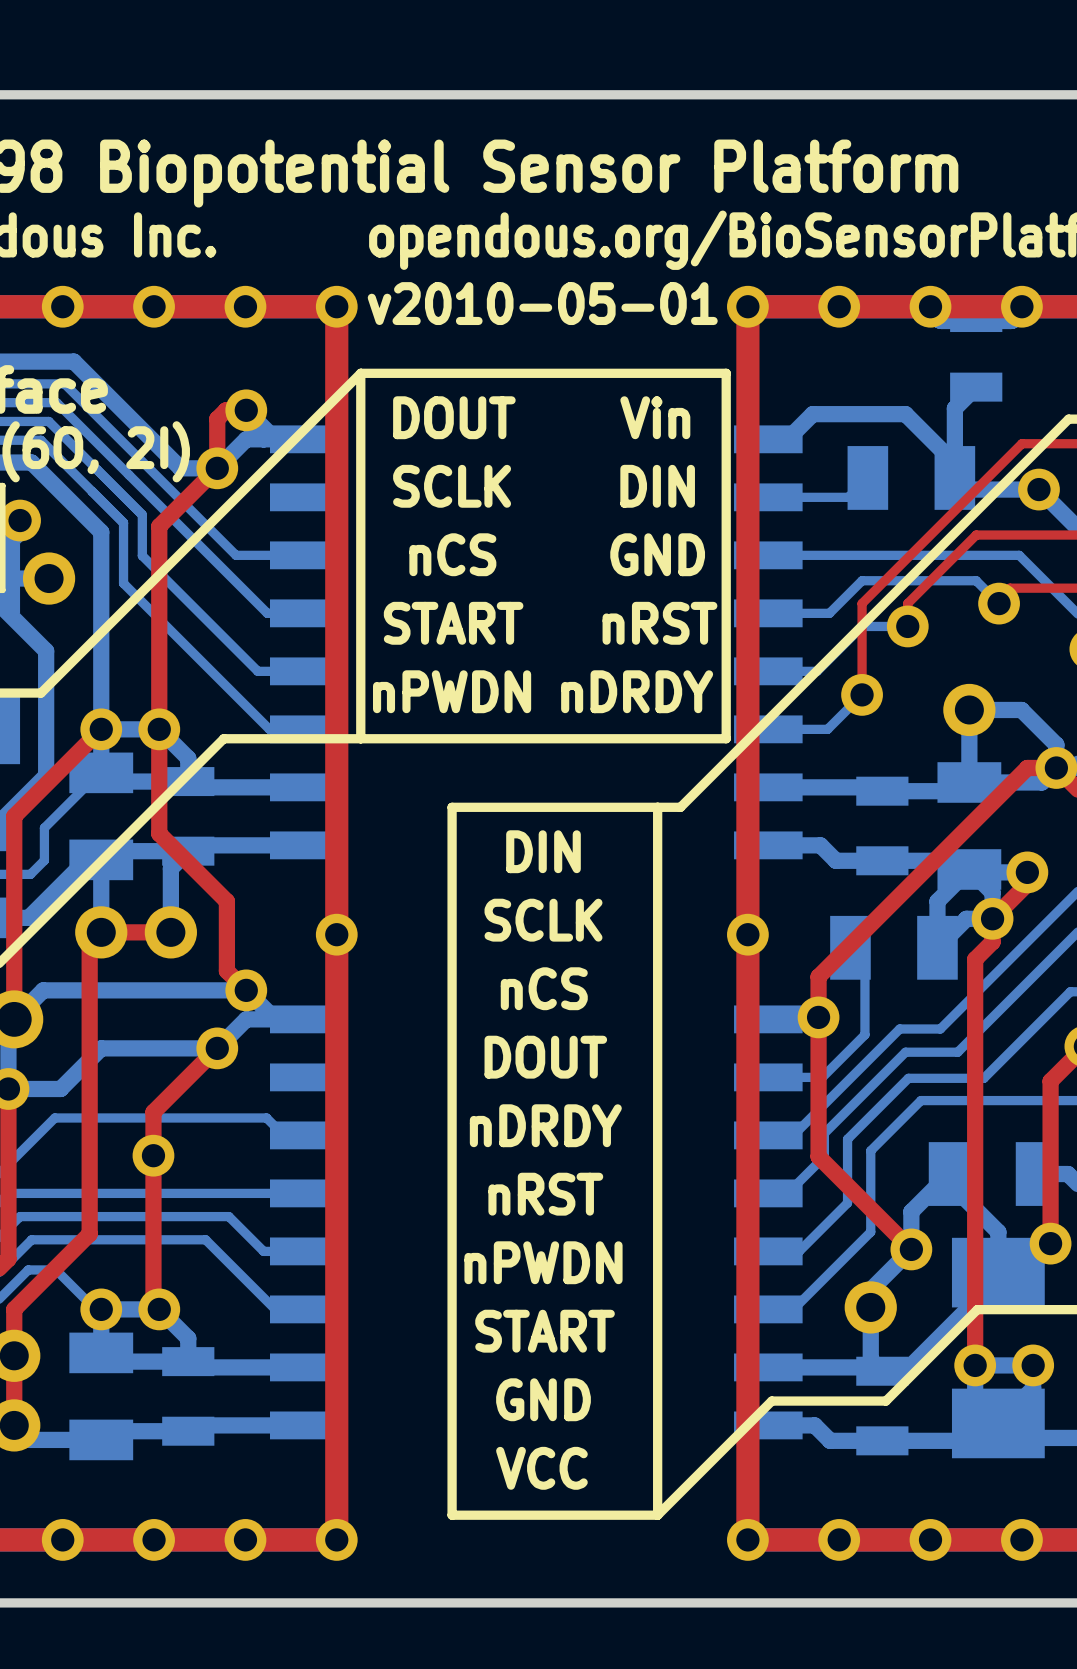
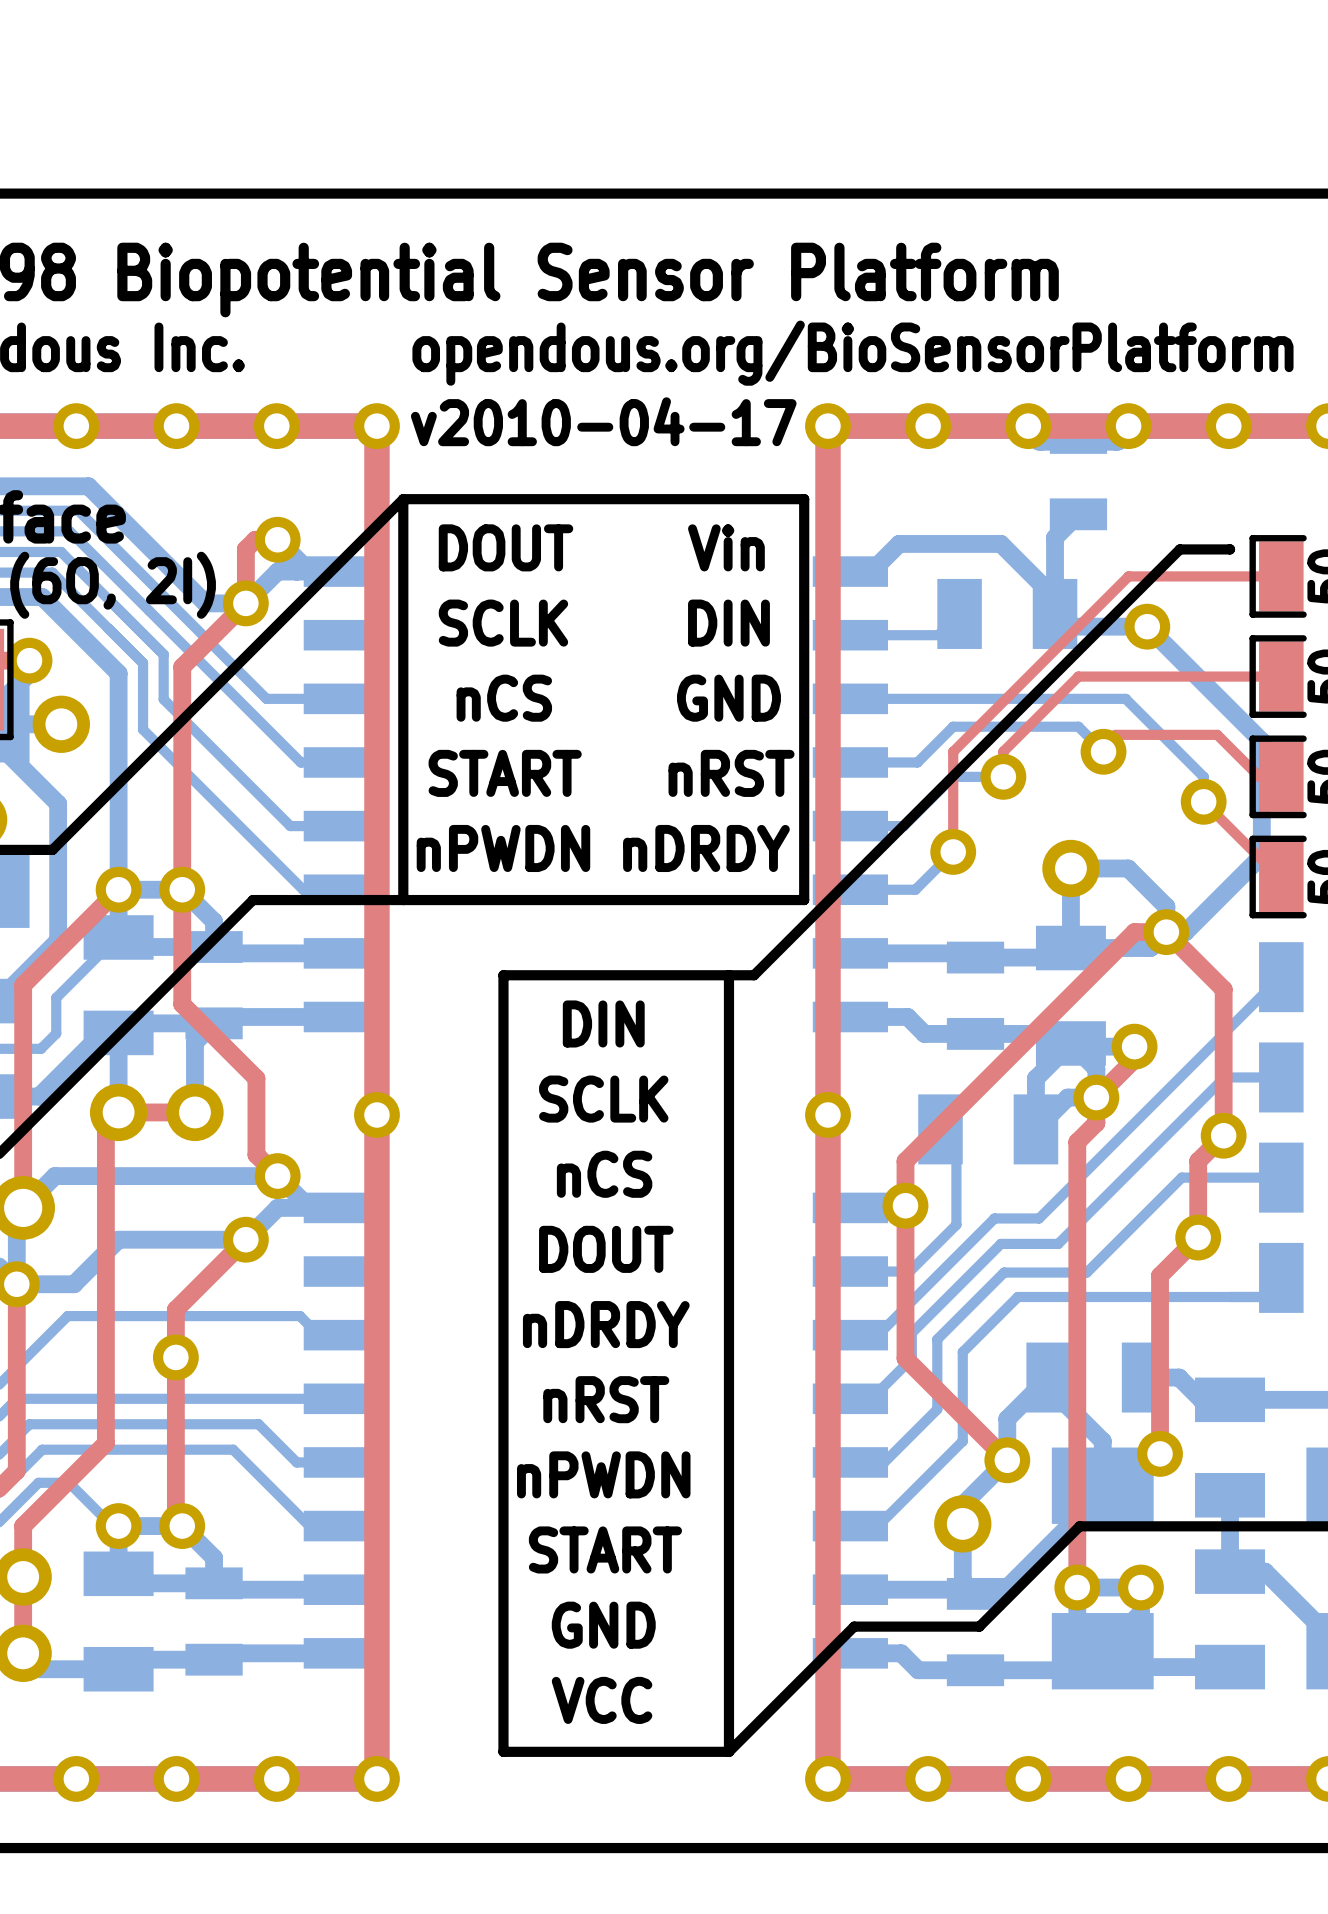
text: v2010-05-01 (542, 303) -> v2010-04-17 (603, 421)

